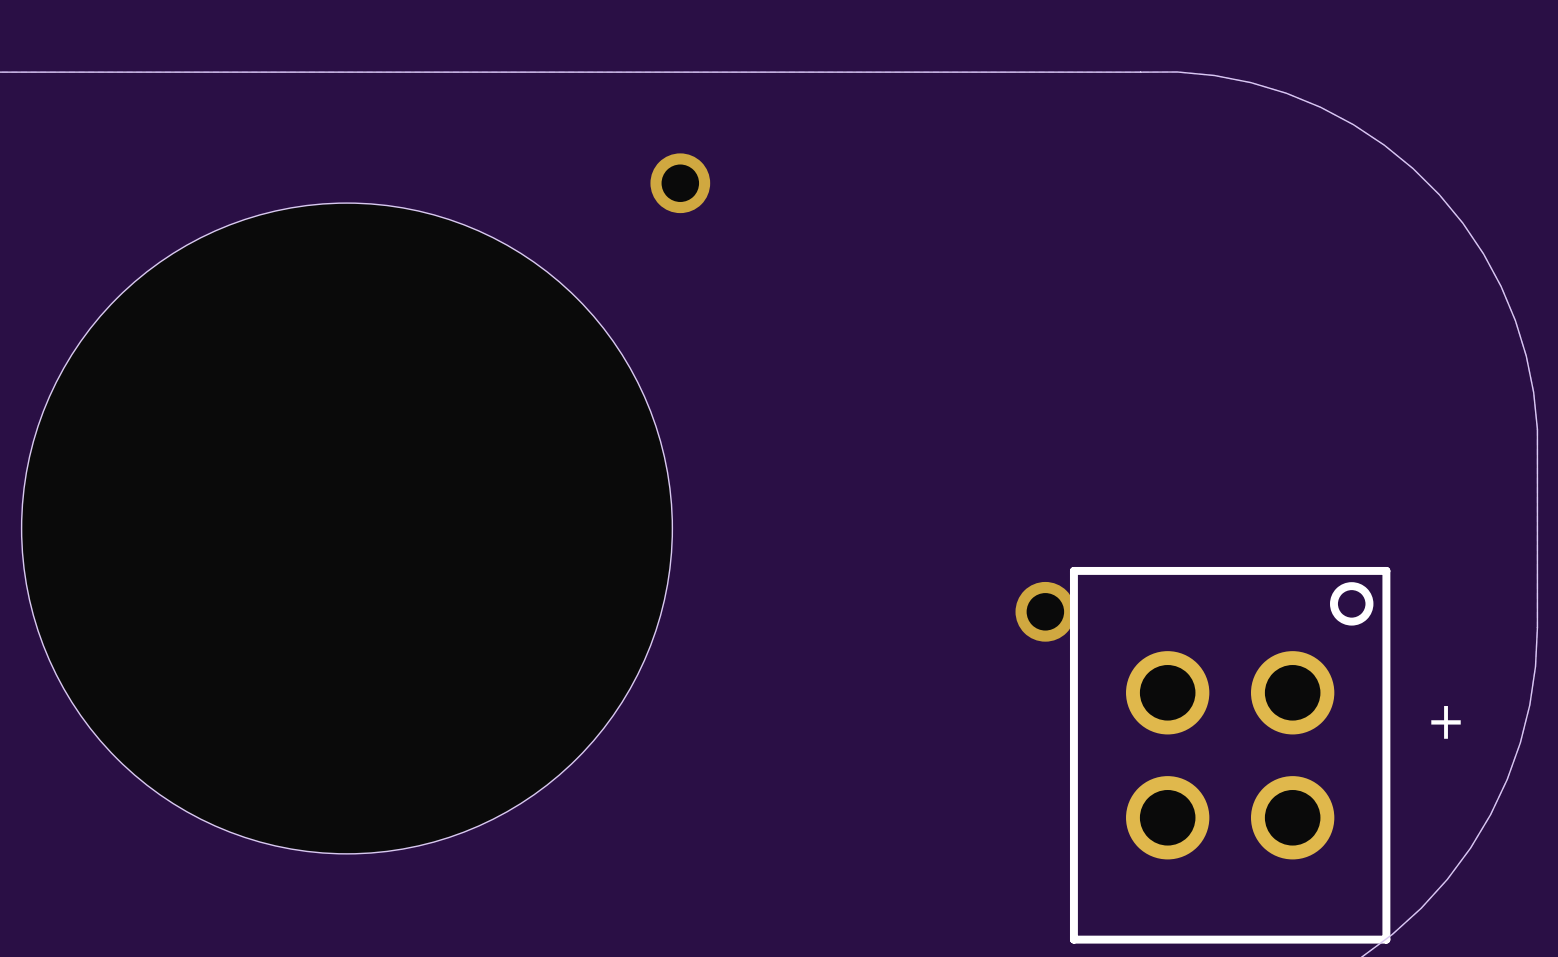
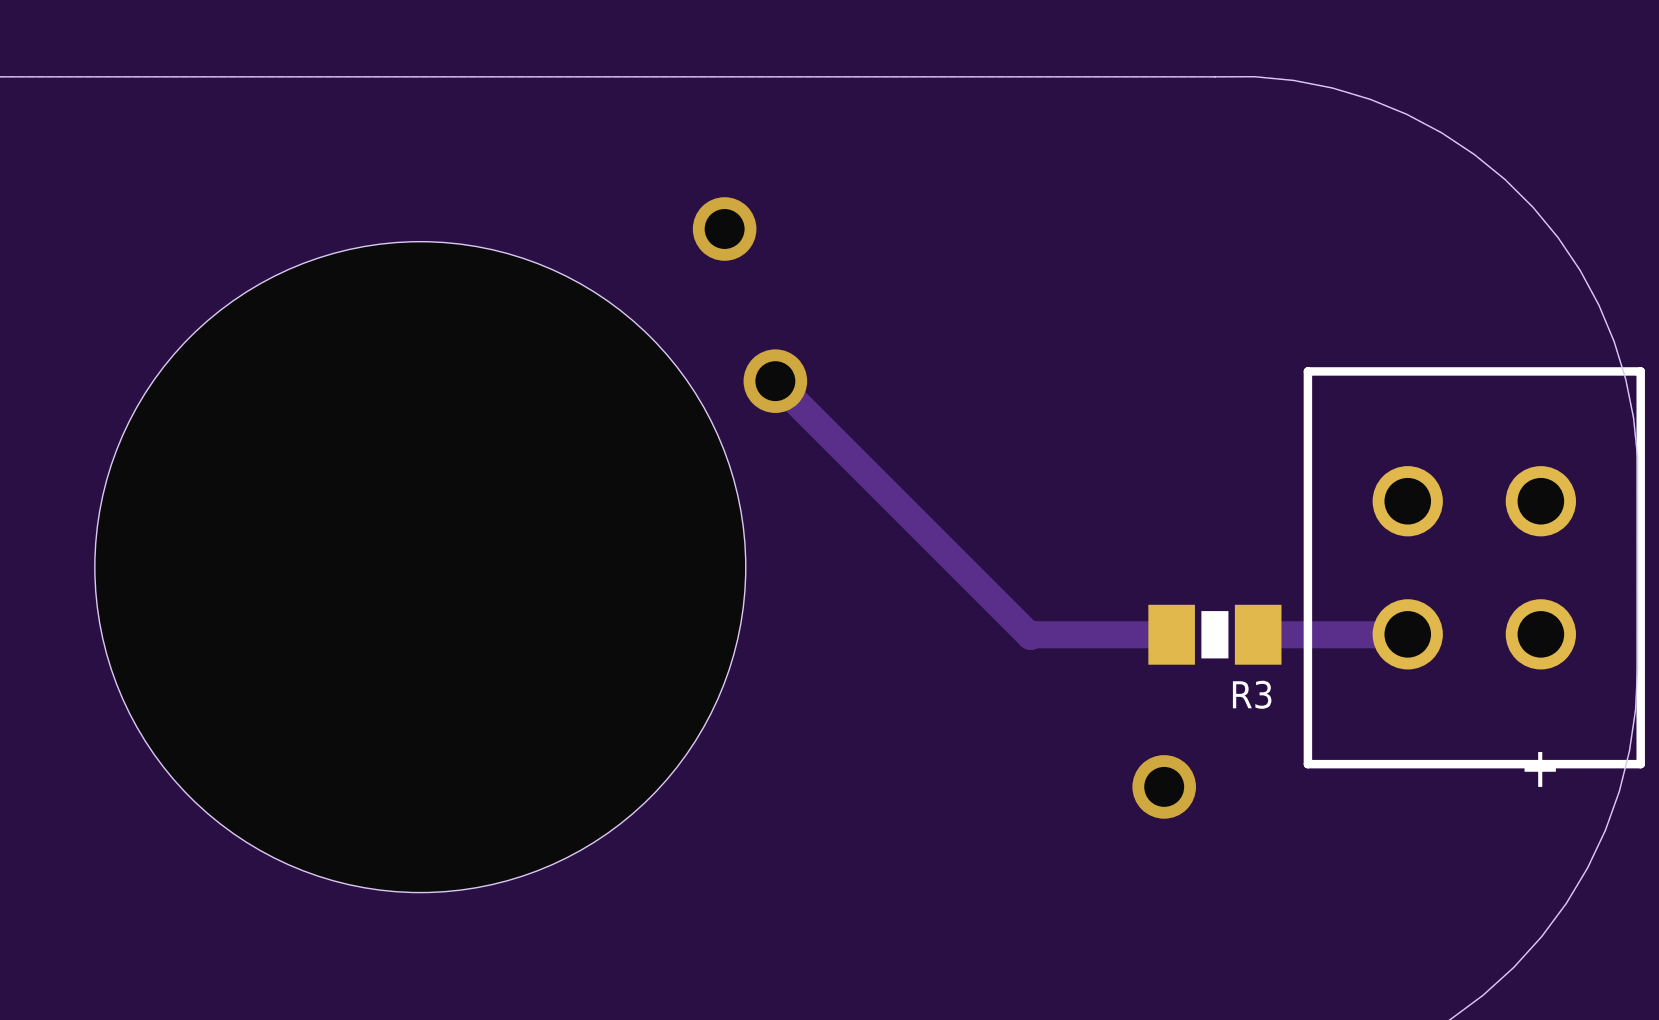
via position: (680, 183) -> (724, 228)
hole size: [21, 203, 673, 854] -> [94, 241, 746, 893]
track: none -> (775, 381) (1030, 636) (1032, 634) (1171, 634)
via: none -> (775, 381)
part: none -> (1474, 567)
R3: none -> (1214, 634)
track: none -> (1407, 634) (1258, 634)
via position: (1045, 611) -> (1164, 786)
part: (1230, 755) -> none

